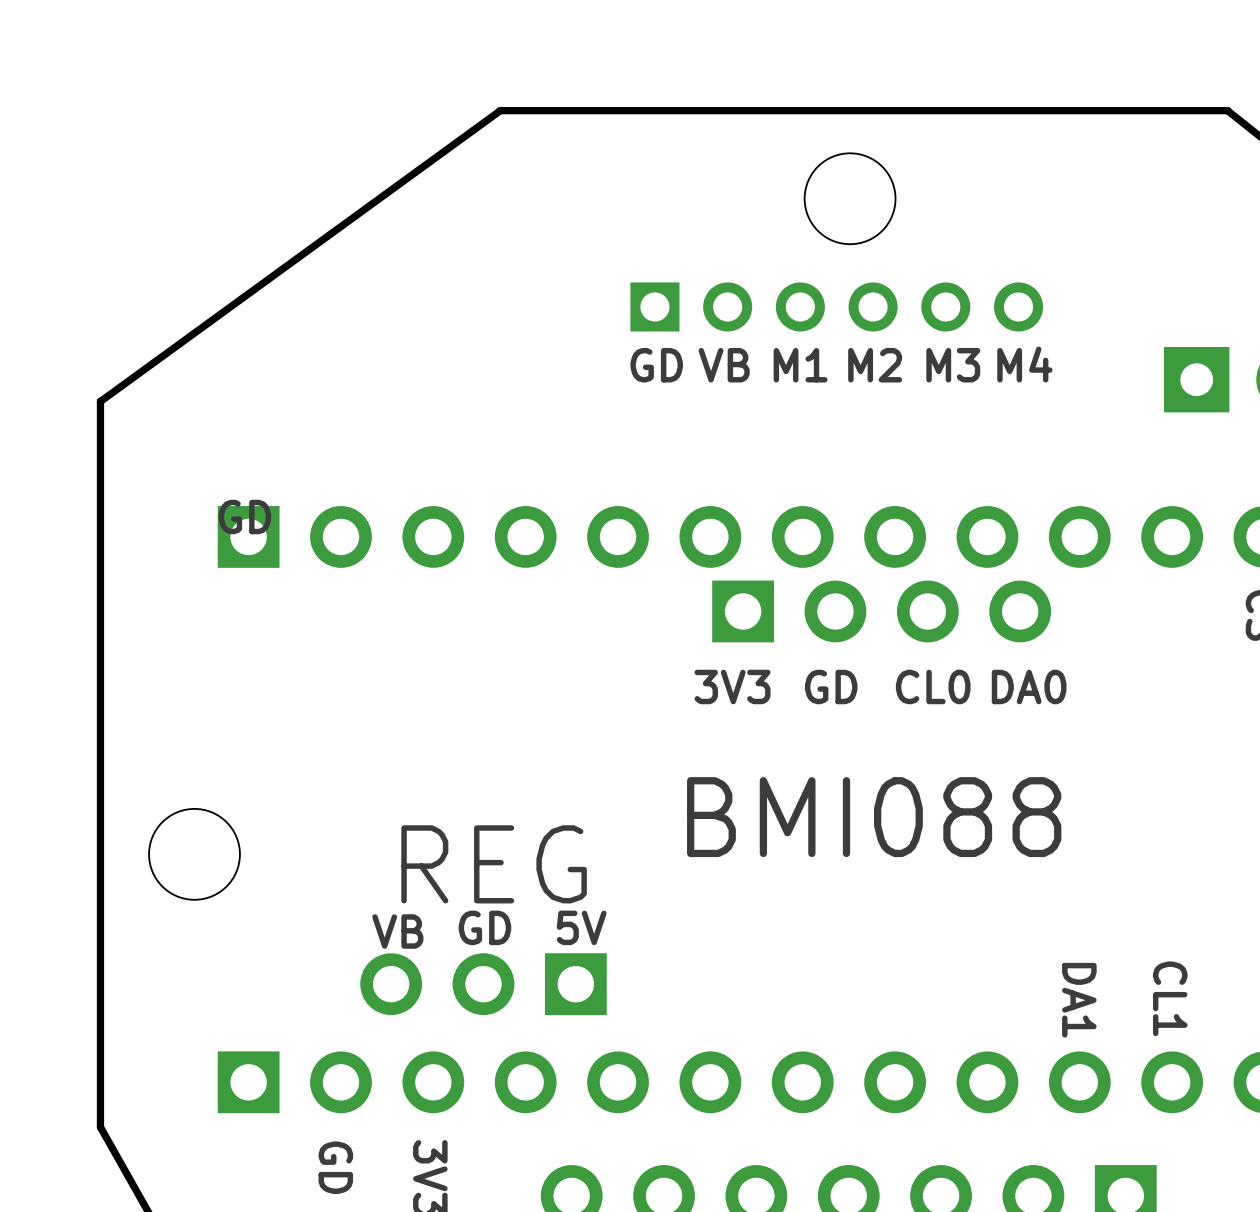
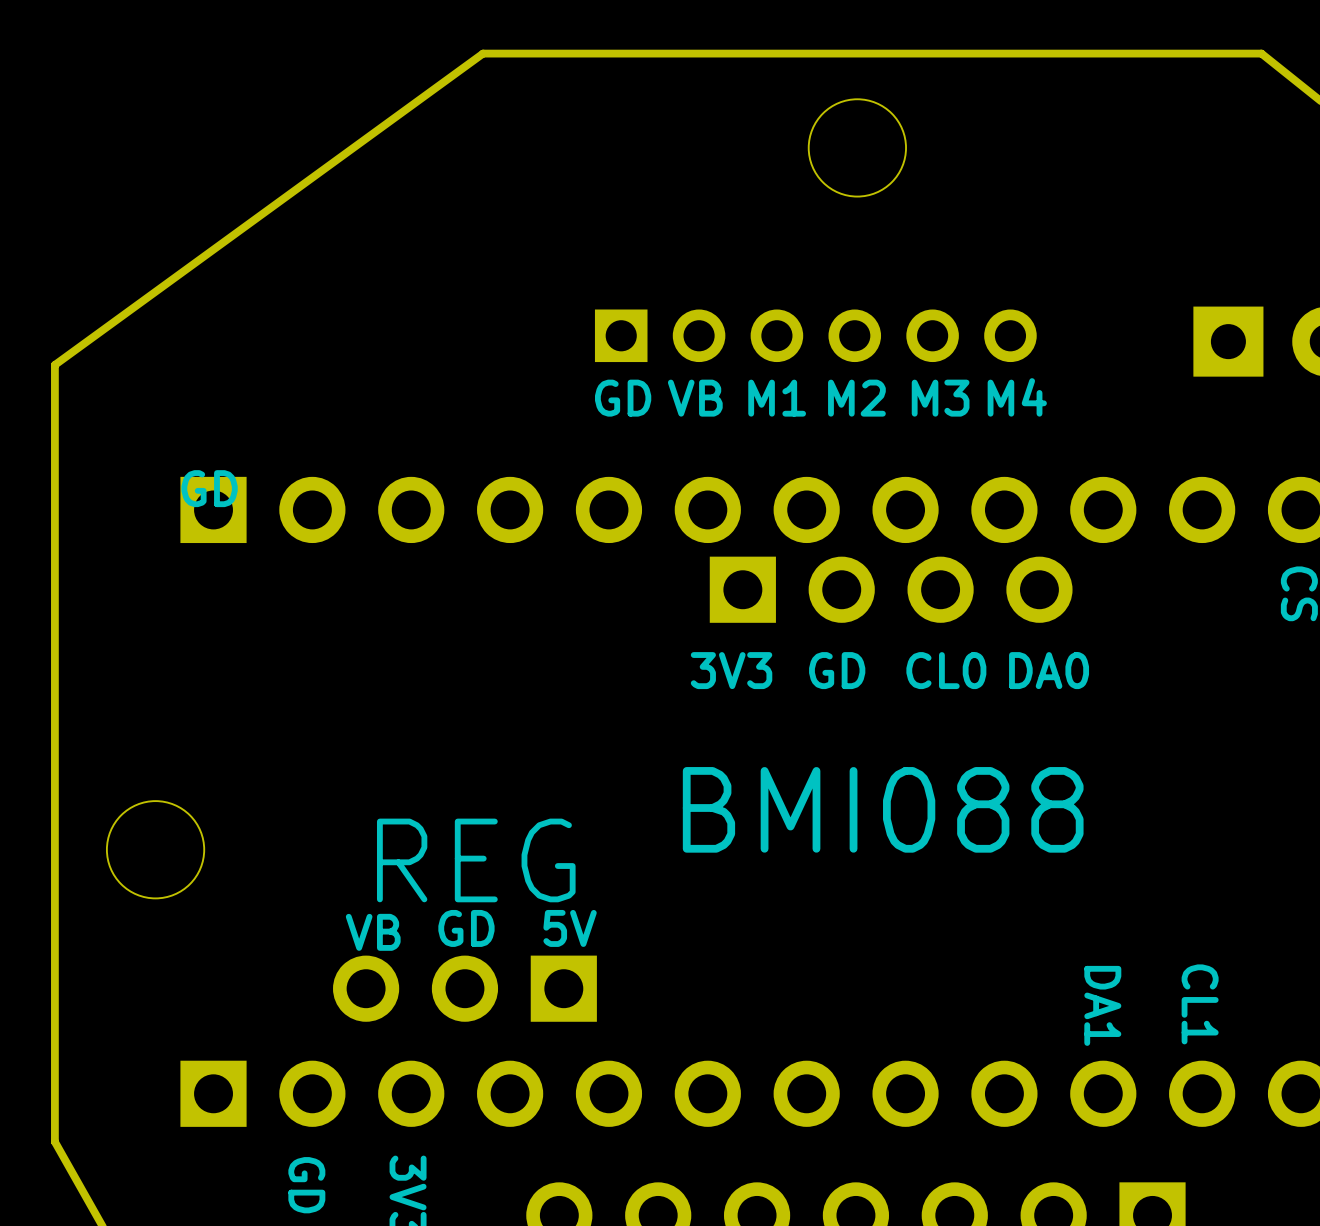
part position: (836, 306) -> (815, 335)
text position: M4 (1024, 364) -> M4 (1017, 397)
text position: GD (656, 365) -> GD (623, 398)
text position: VB (724, 365) -> VB (695, 398)
text position: M1 (800, 365) -> M1 (777, 398)
text position: M2 (875, 365) -> M2 (856, 398)
text position: M3 (953, 365) -> M3 (940, 398)

